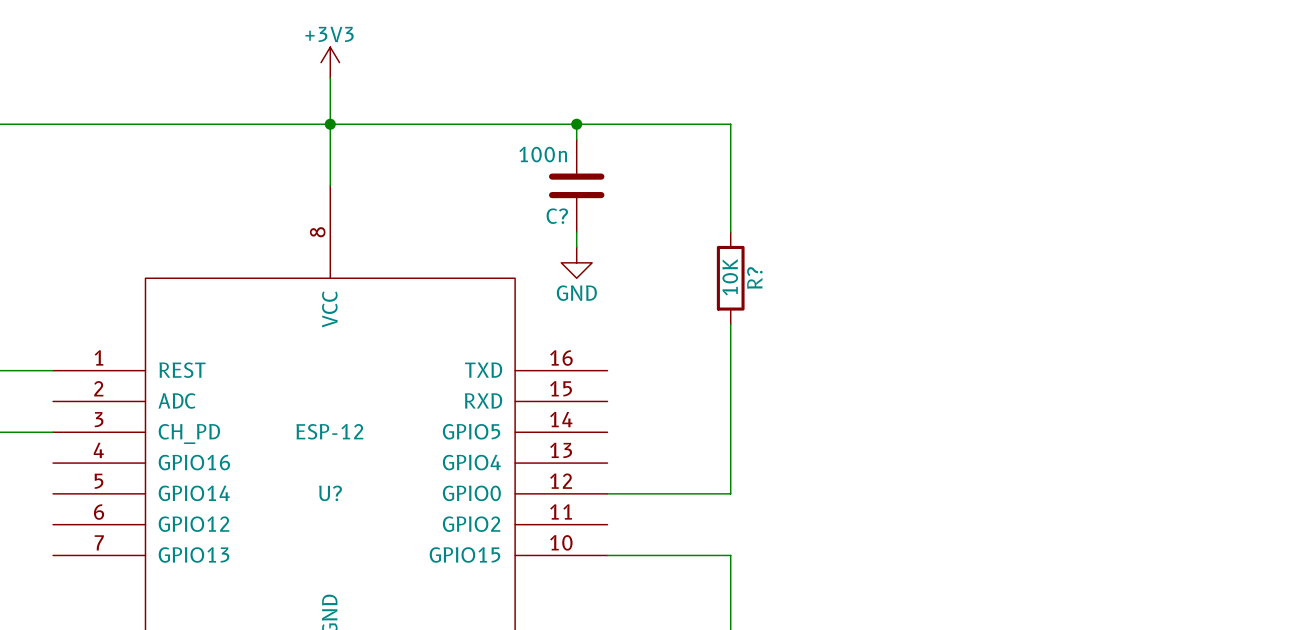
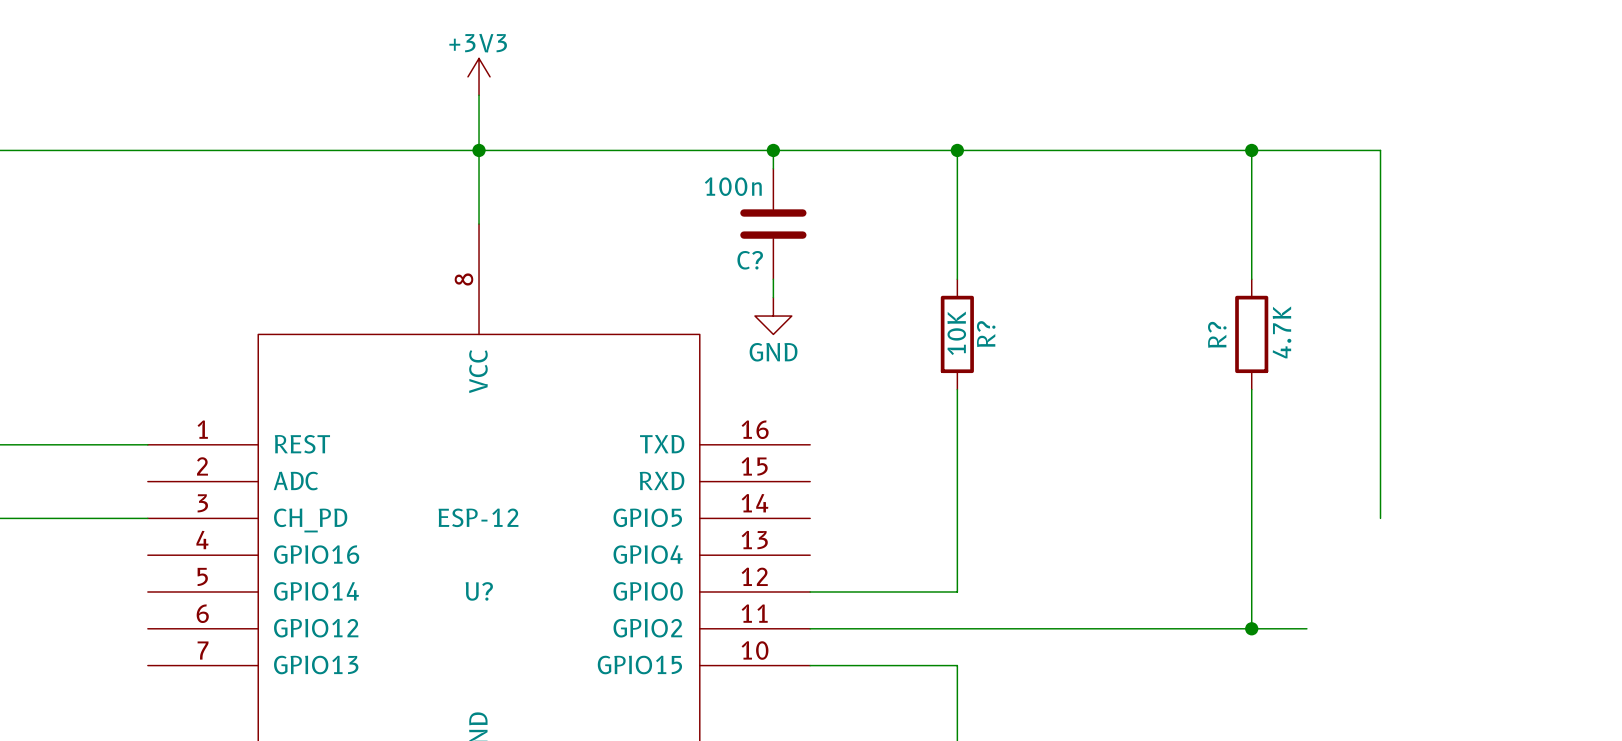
wire: none -> (957, 150) (1380, 150) (1380, 518)
junction: none -> (957, 150)
wire: none -> (1251, 150) (1251, 279)
junction: none -> (1251, 150)
R?: none -> 4.7K (1251, 334)
wire: none -> (1251, 389) (1251, 628)
wire: none -> (810, 628) (1306, 628)
junction: none -> (1251, 628)

